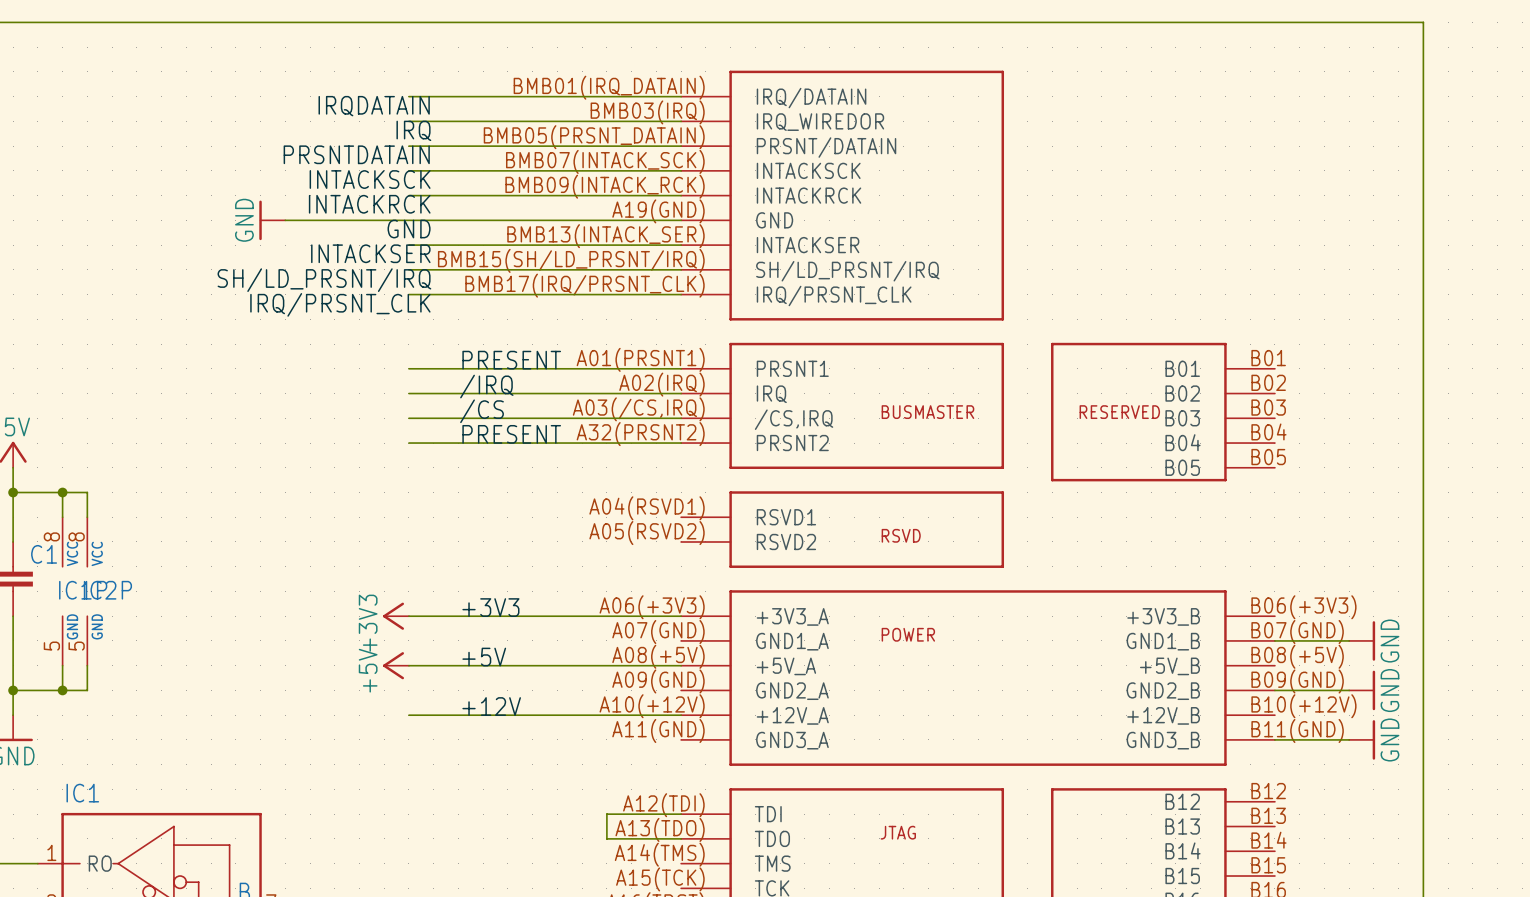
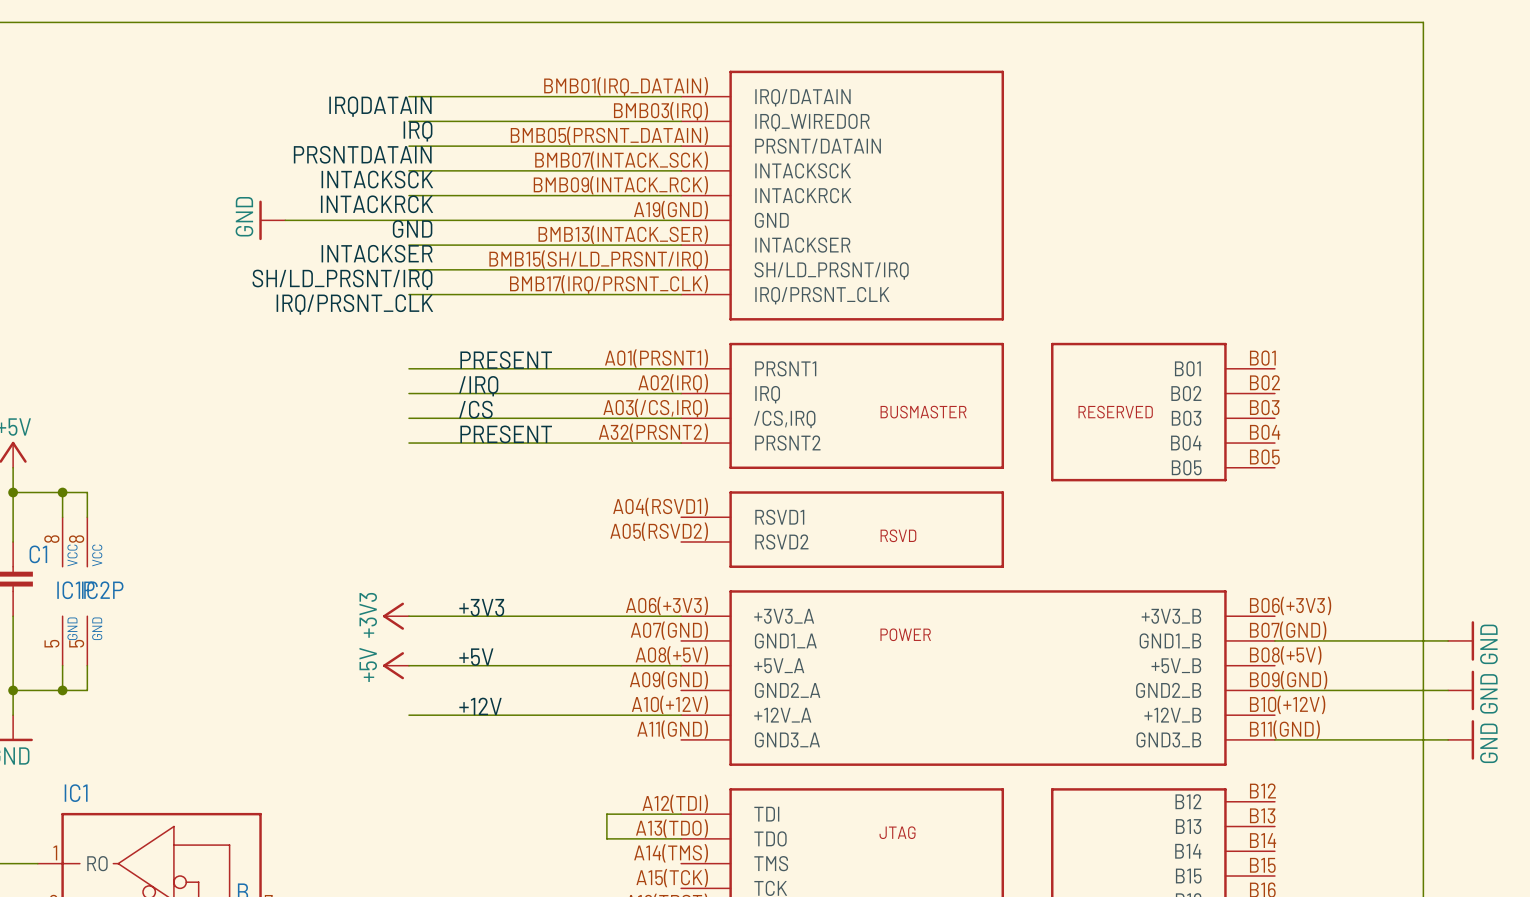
wire: none -> (1349, 640) (1448, 640)
power symbol: GND (1362, 640) -> none
power symbol: none -> GND (1461, 640)
wire: none -> (1349, 690) (1448, 690)
power symbol: GND (1362, 690) -> none
power symbol: none -> GND (1461, 690)
wire: none -> (1349, 739) (1448, 739)
power symbol: GND (1362, 739) -> none
power symbol: none -> GND (1461, 739)

